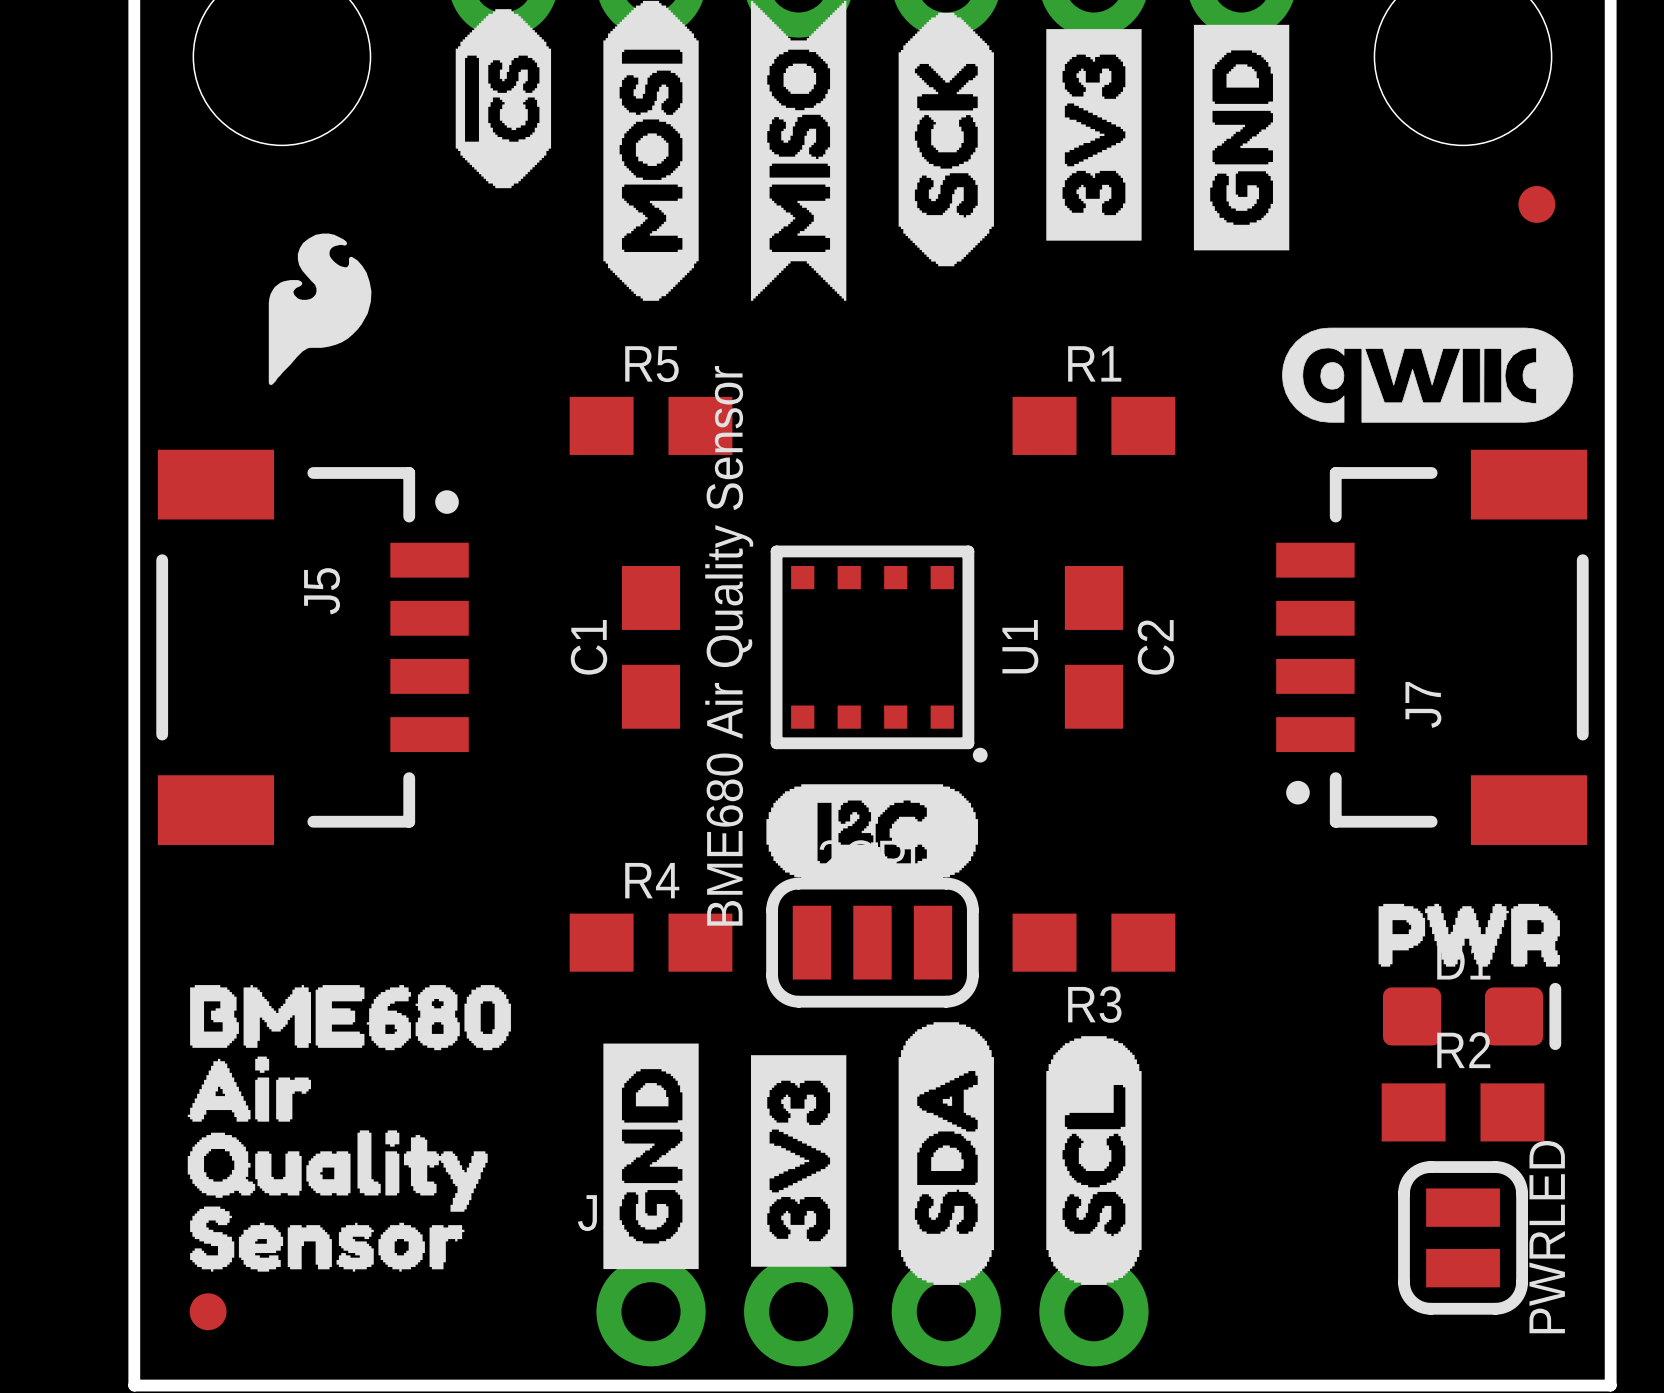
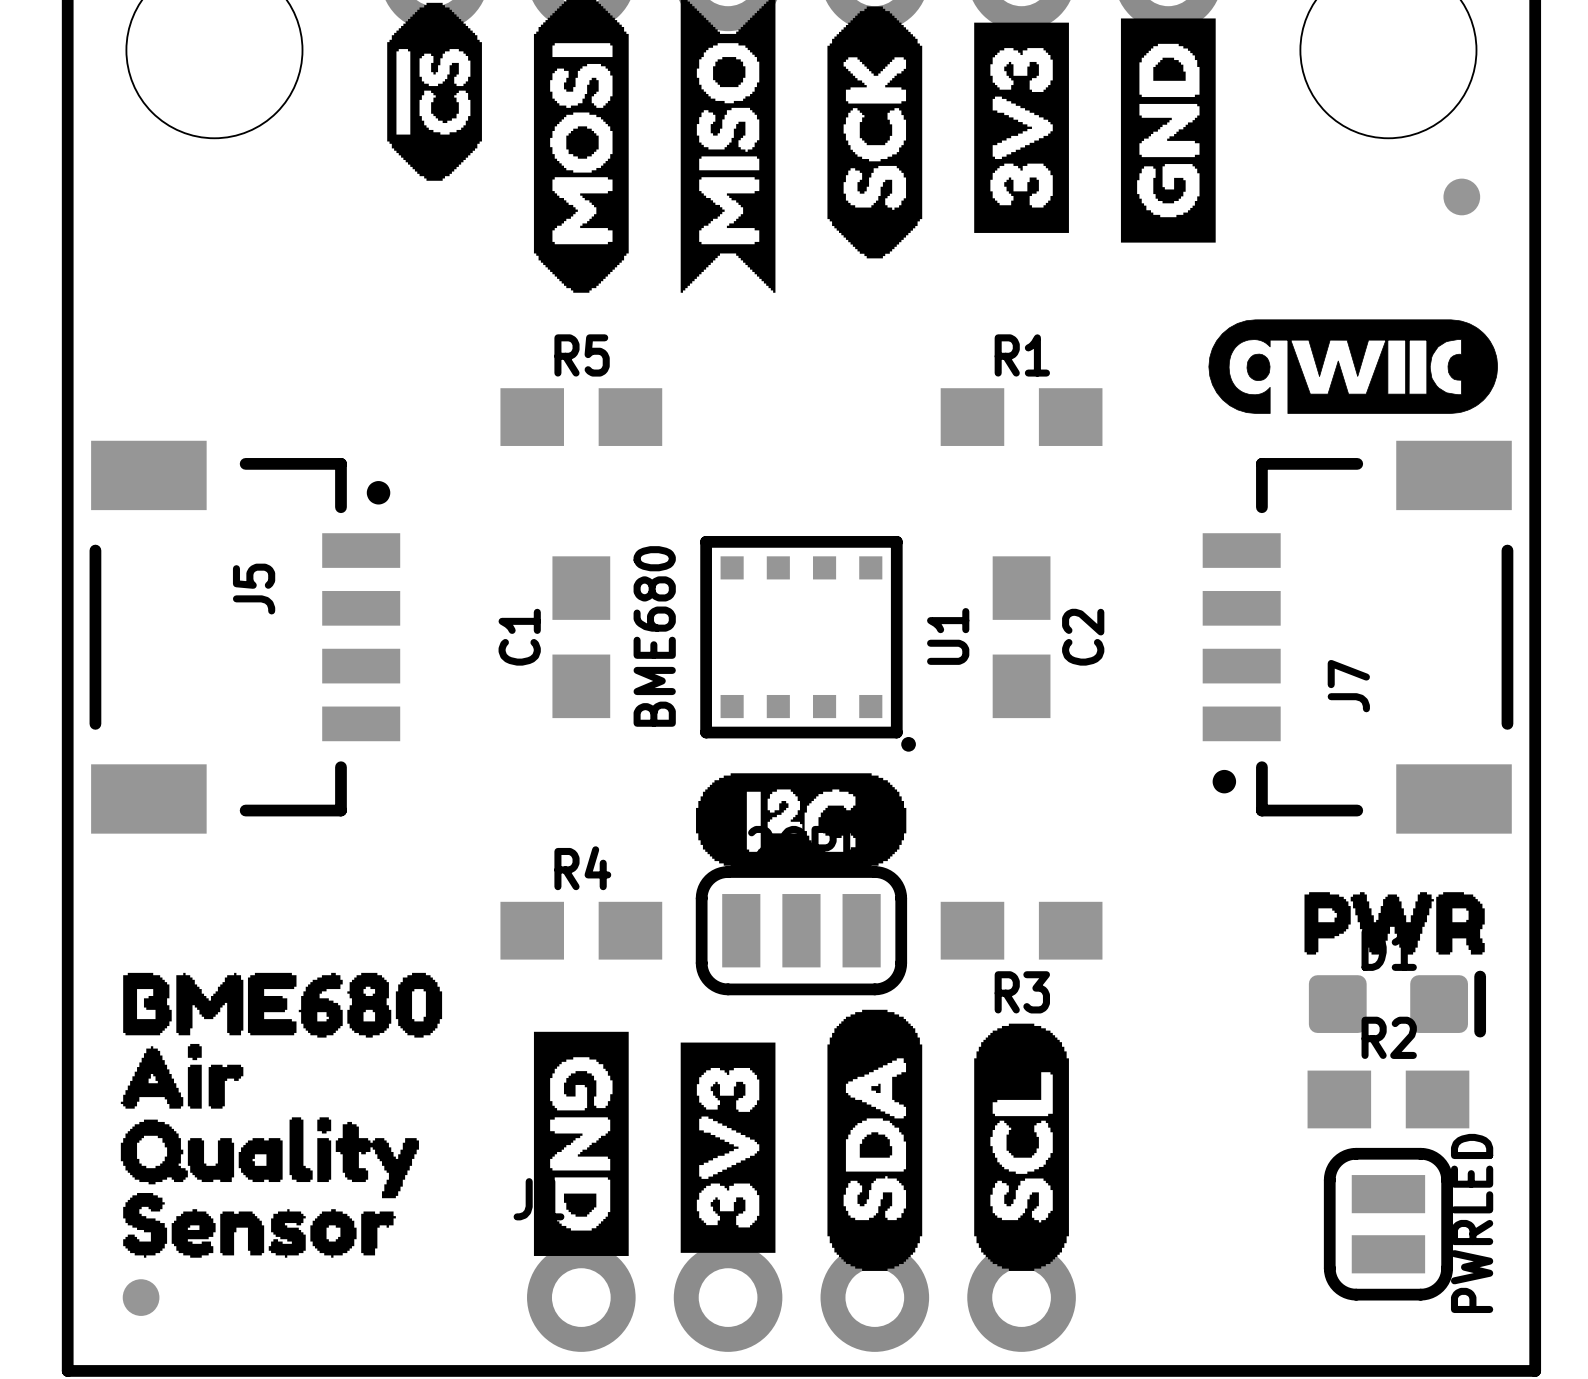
drawing: [268, 233, 372, 386] -> none
U1 value: BME680 Air Quality Sensor (729, 645) -> BME680 (654, 636)
drawing shape: [603, 1043, 699, 1270] -> [533, 1031, 629, 1256]

